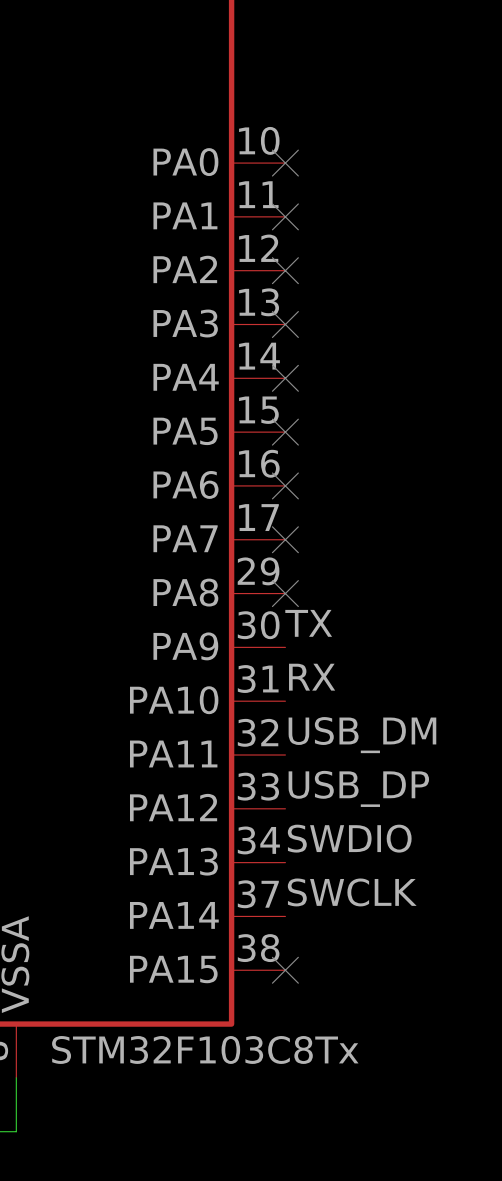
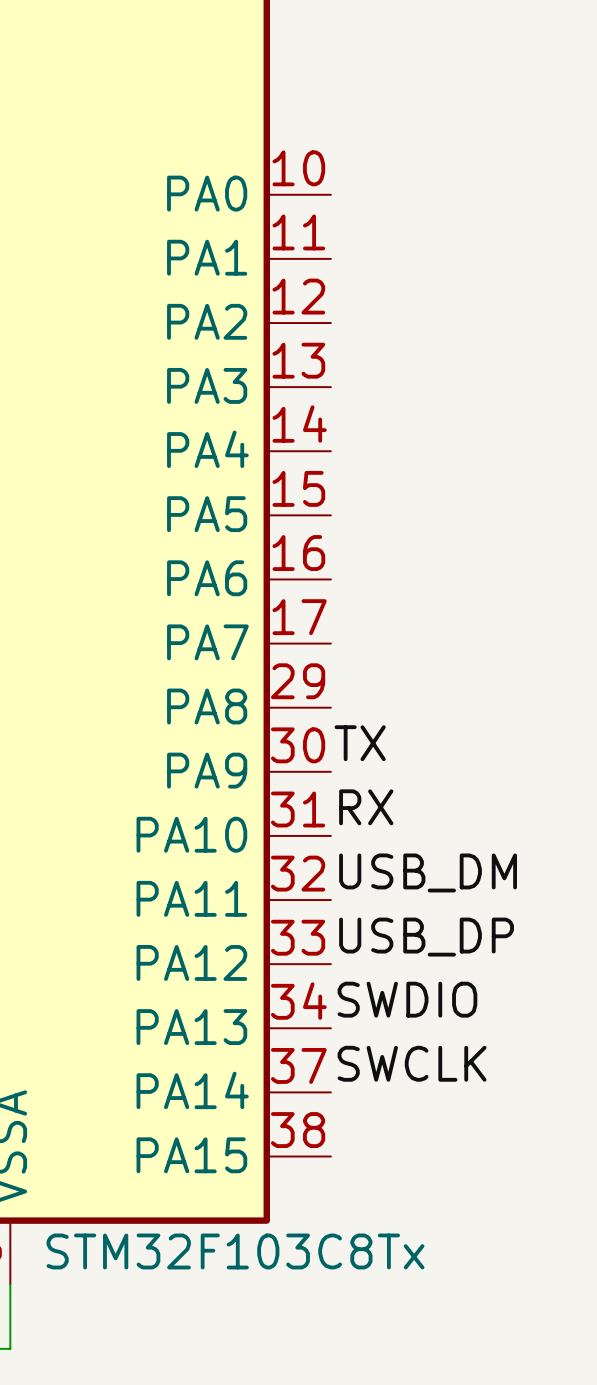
no-connect mark: (285, 163) -> none
no-connect mark: (285, 216) -> none
no-connect mark: (285, 270) -> none
no-connect mark: (285, 324) -> none
no-connect mark: (285, 378) -> none
no-connect mark: (285, 432) -> none
no-connect mark: (285, 485) -> none
no-connect mark: (285, 539) -> none
no-connect mark: (285, 593) -> none
no-connect mark: (285, 970) -> none

